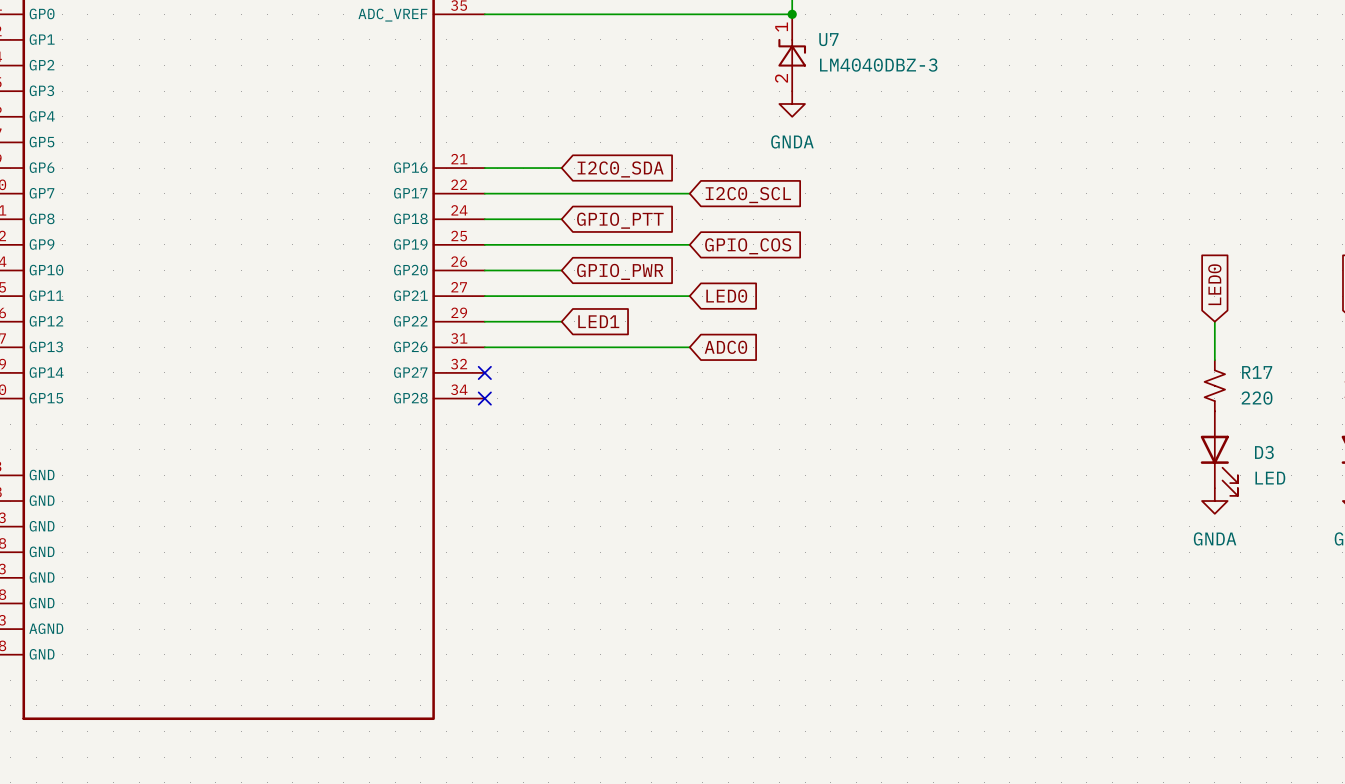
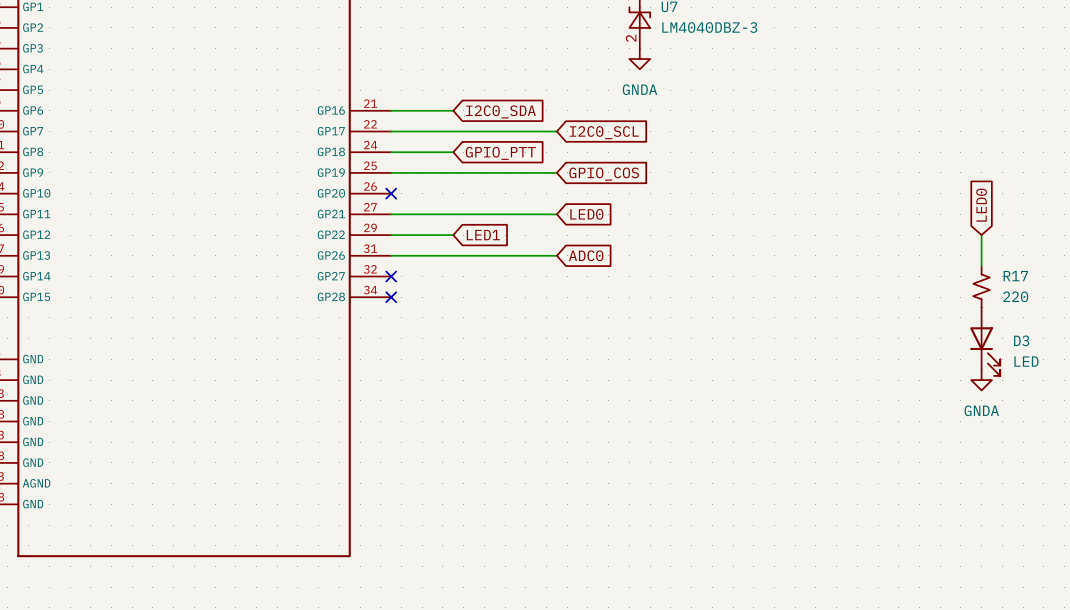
wire: (484, 270) (561, 270) -> none
no-connect mark: none -> (391, 193)
global label: GPIO_PWR (620, 271) -> none

